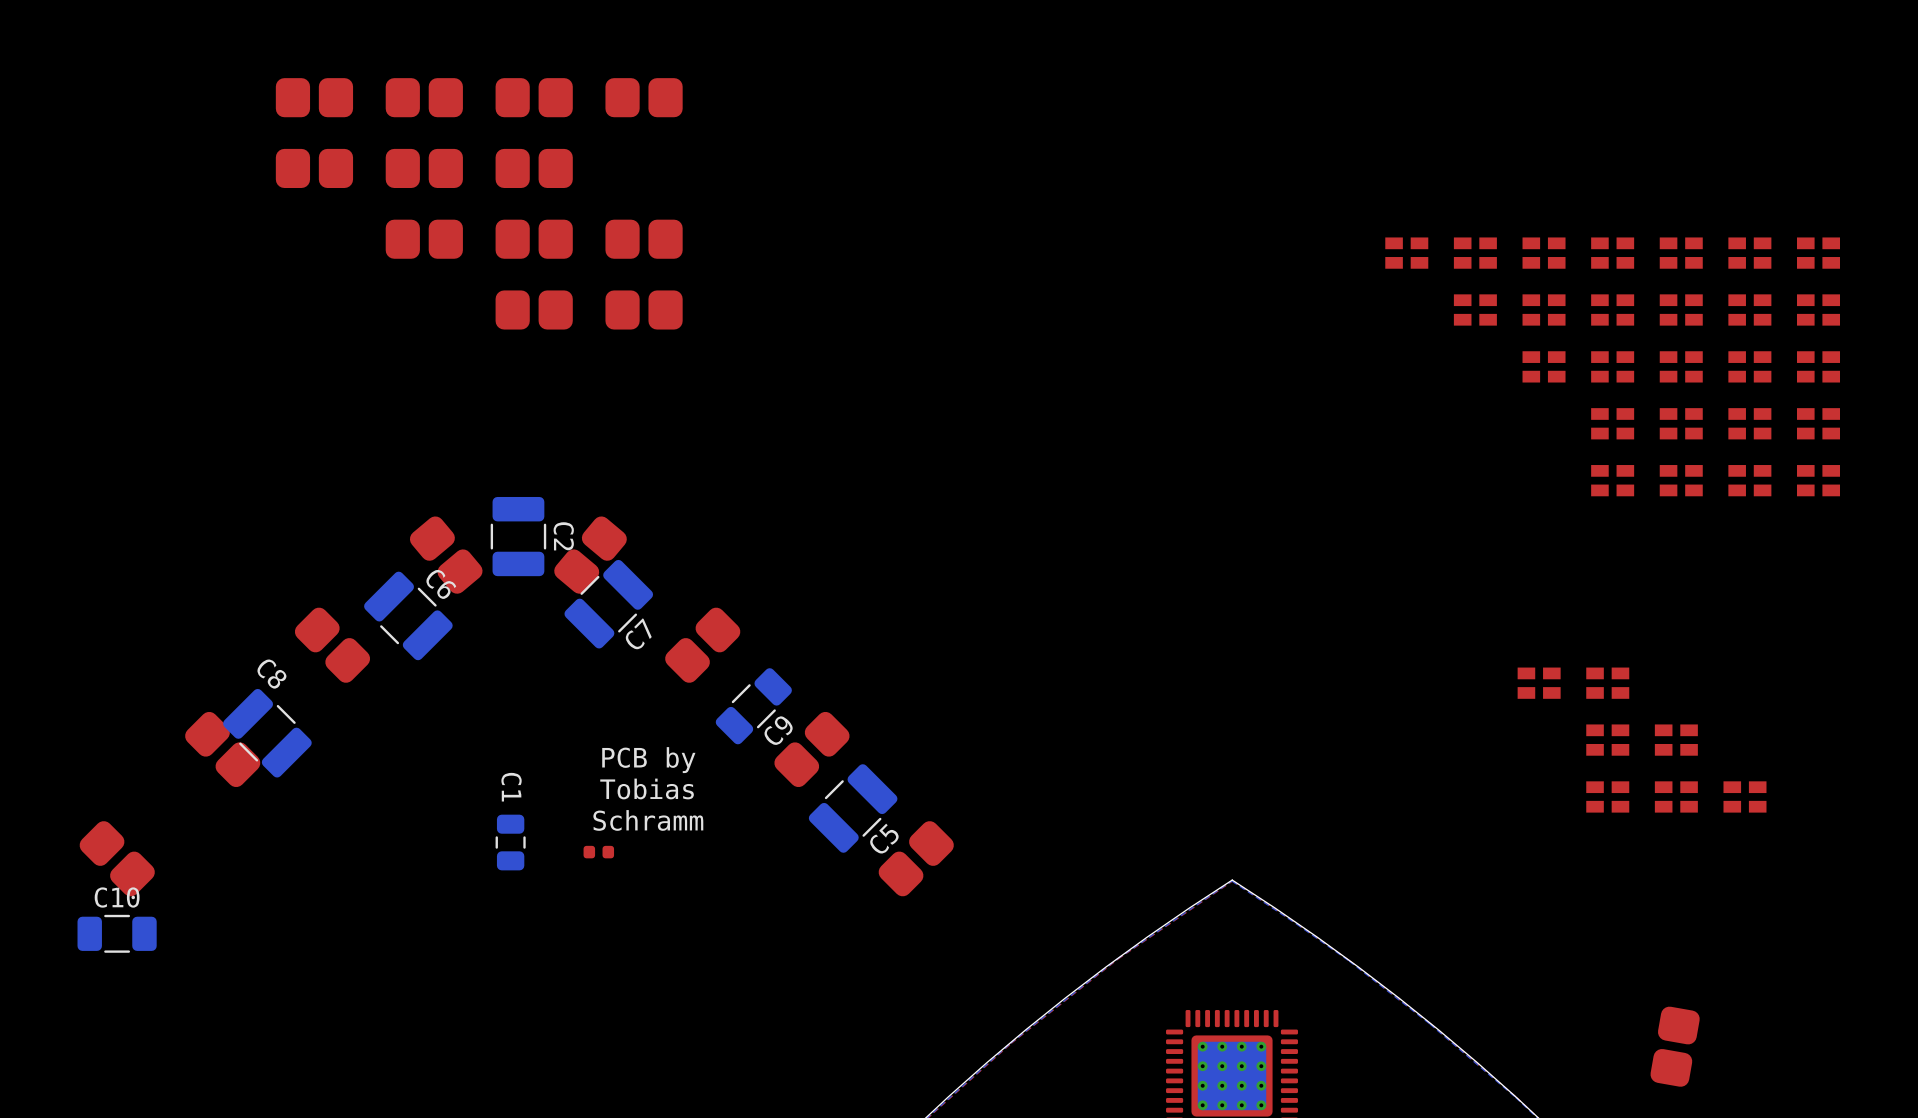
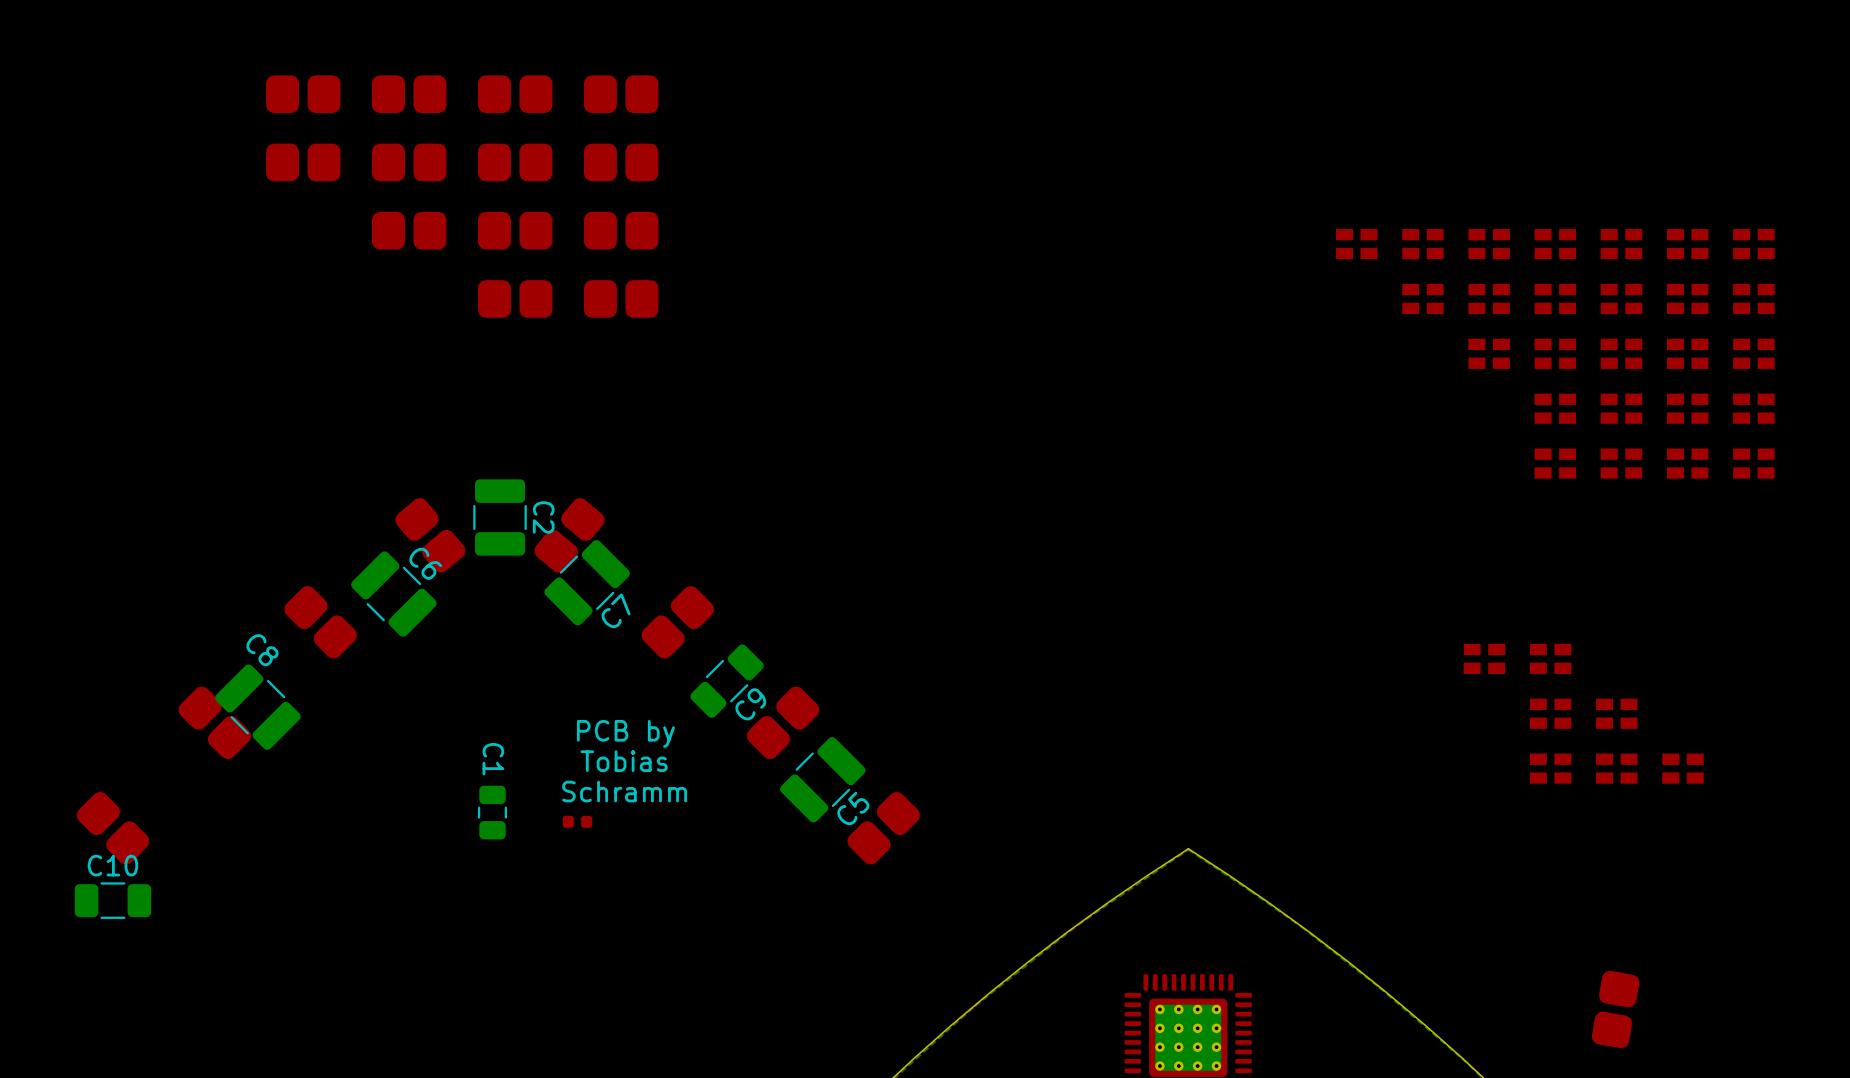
part: none -> (621, 162)

